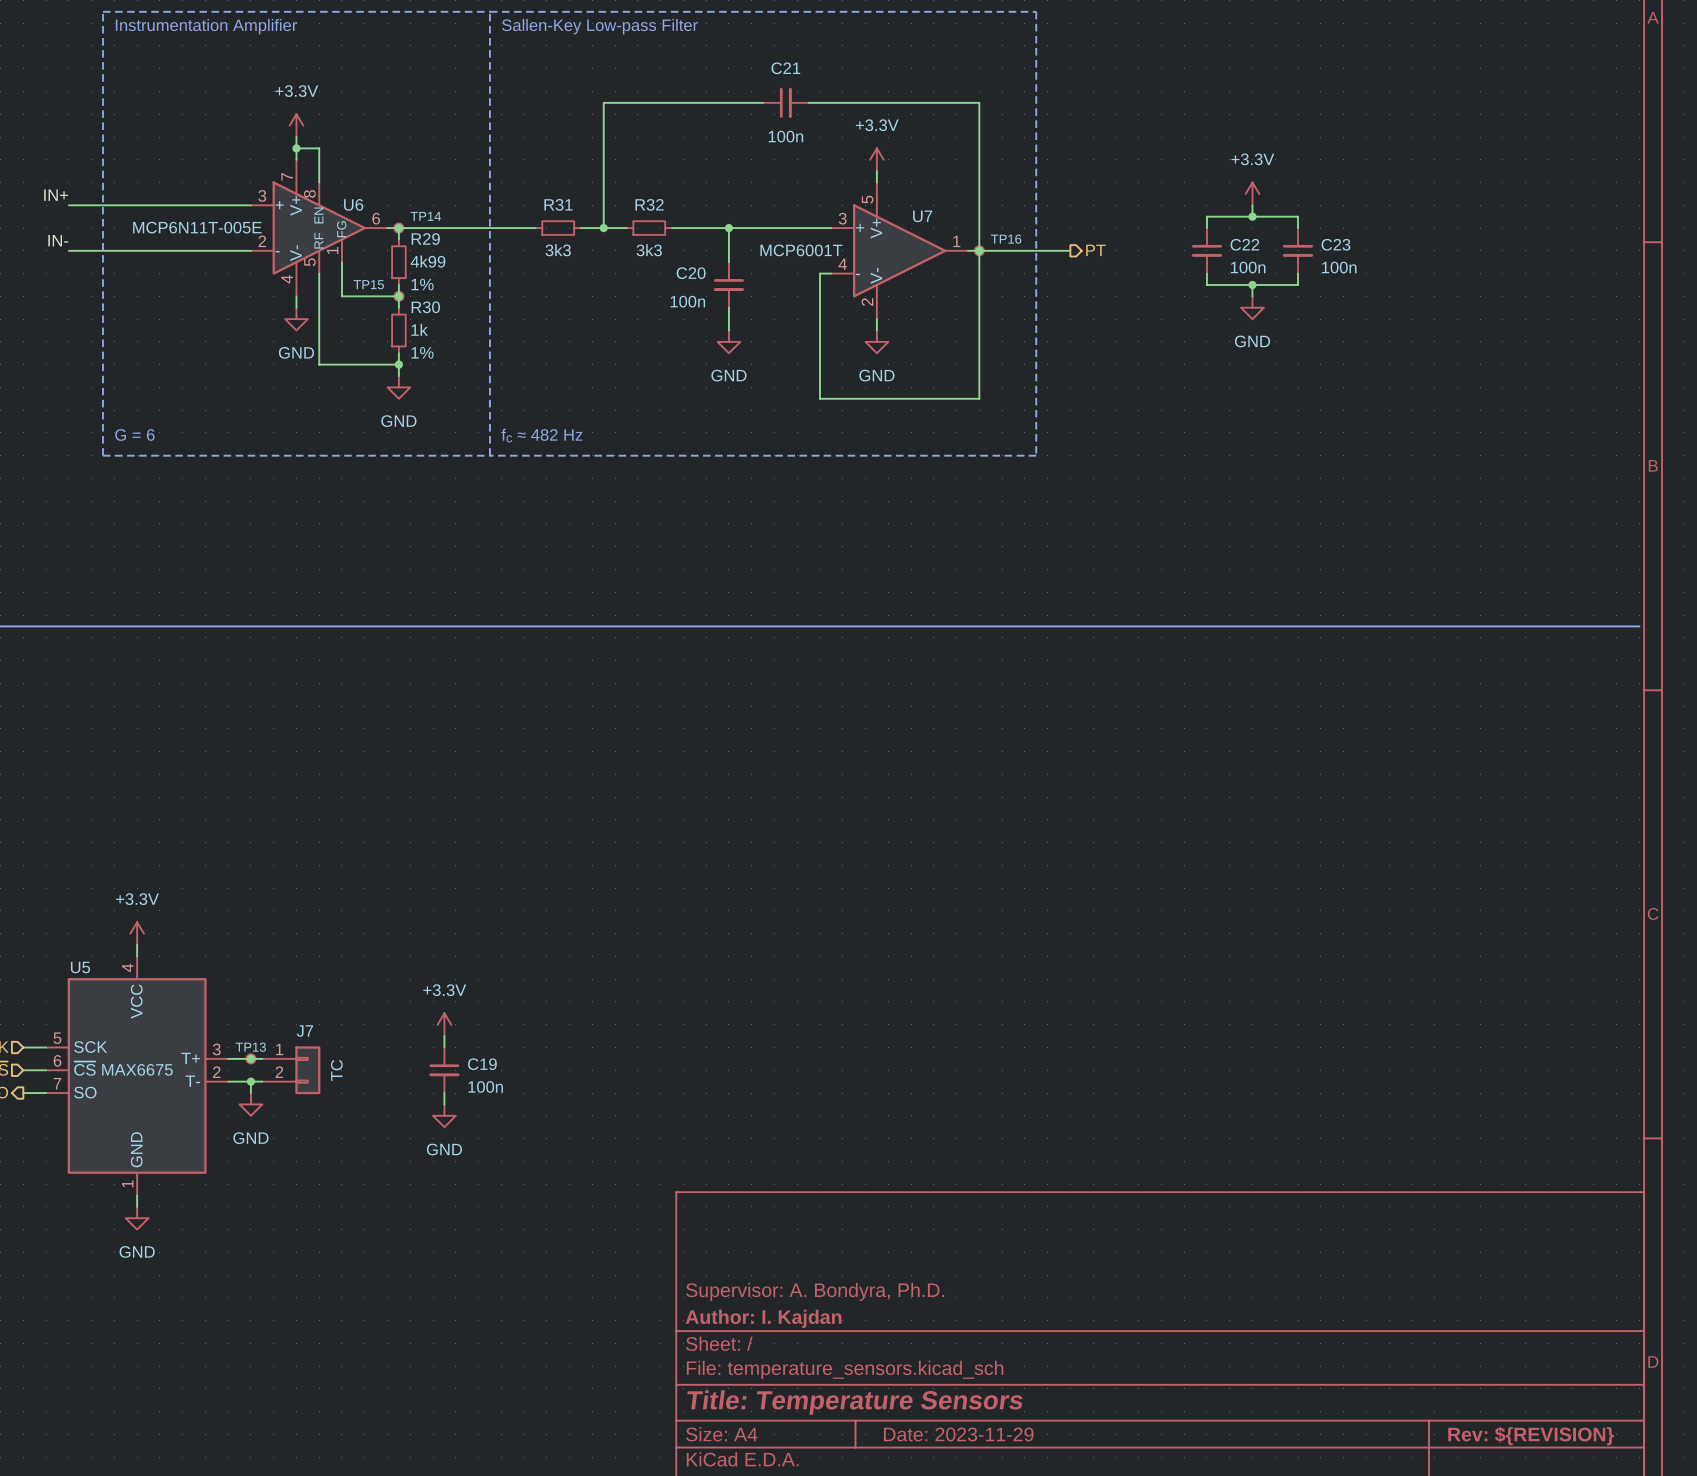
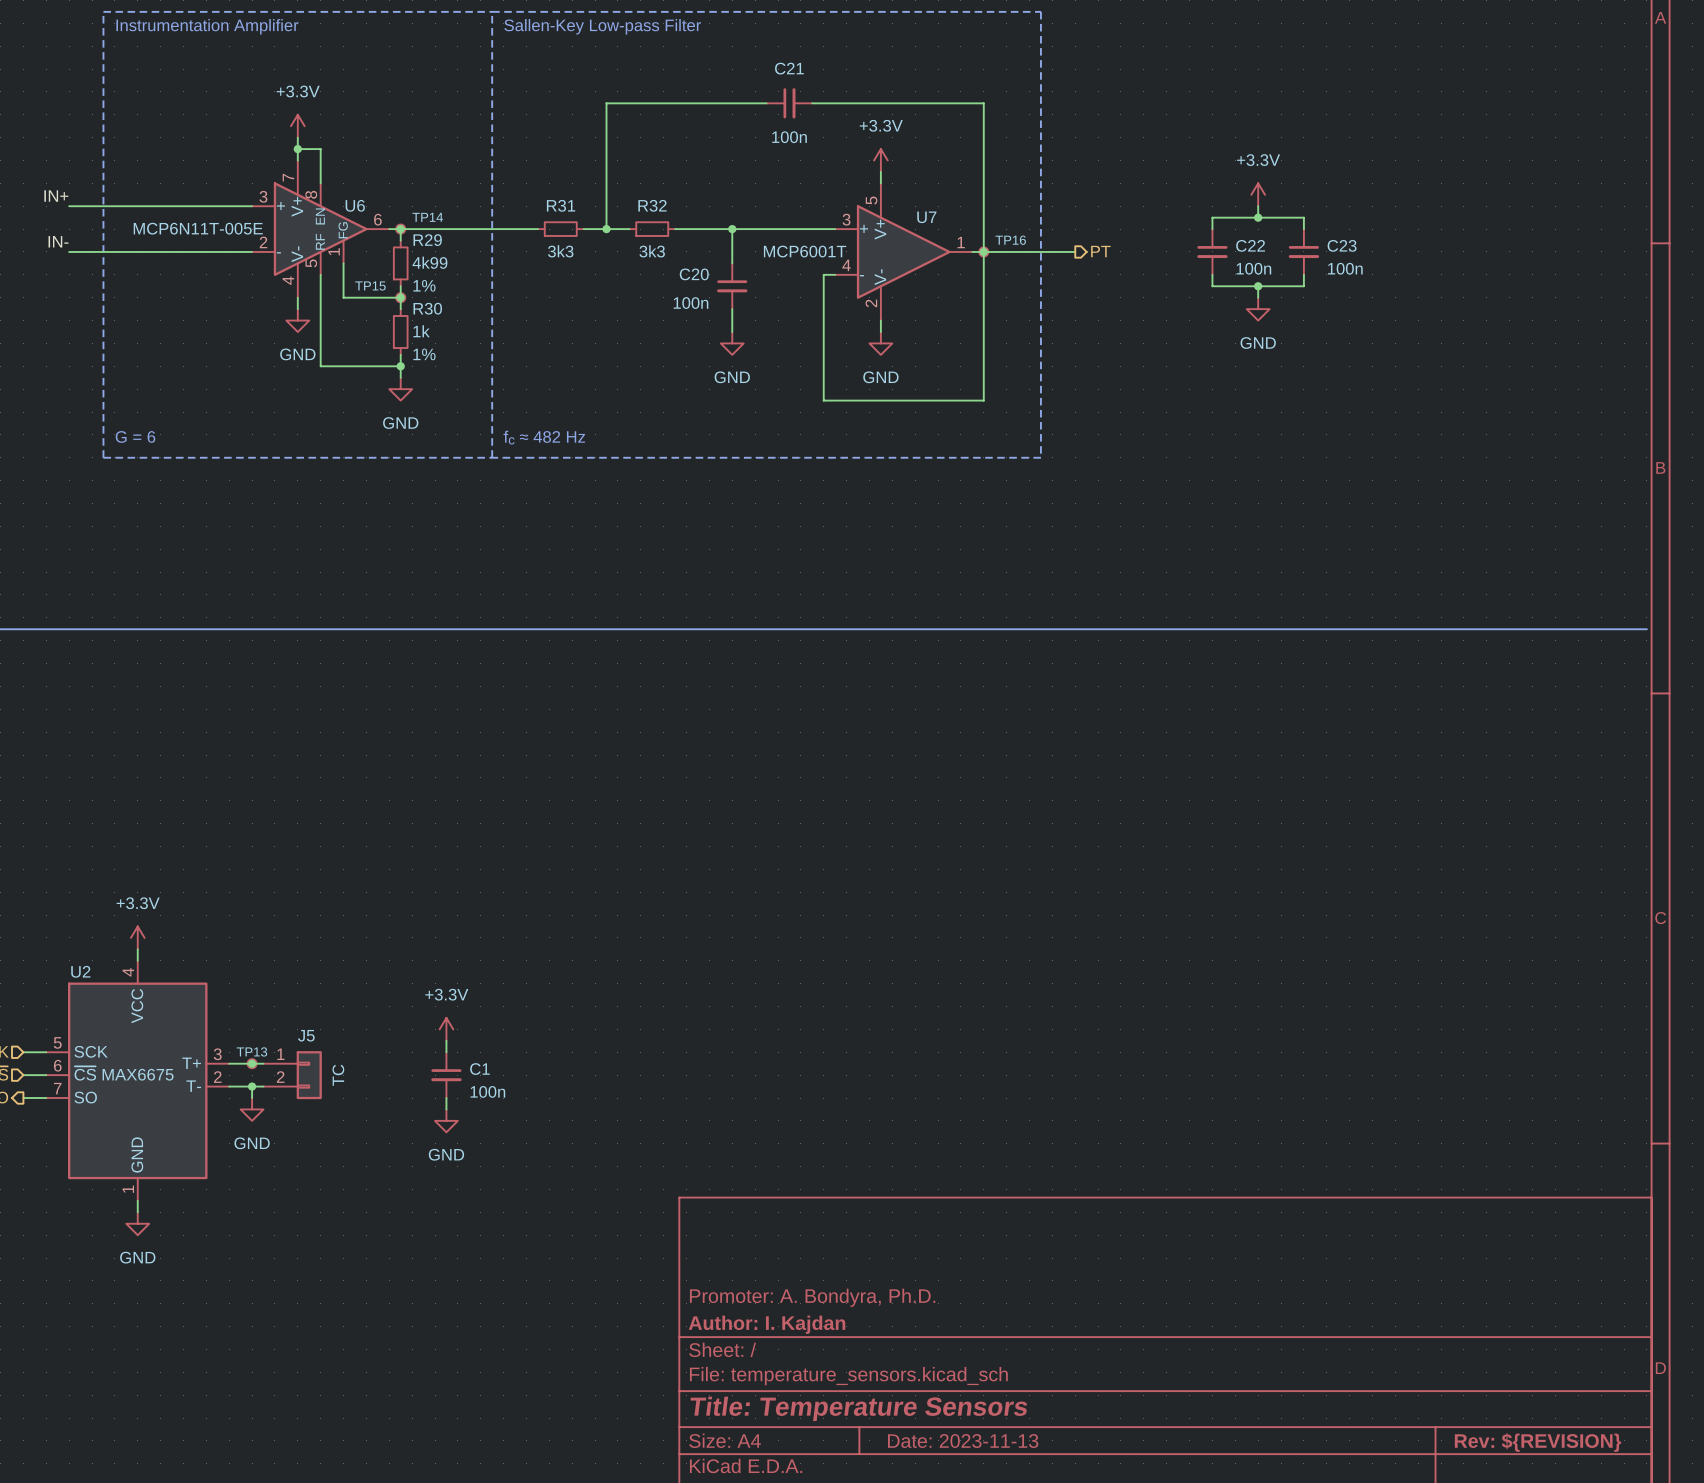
U5 name: U5 (80, 967) -> U2 (80, 971)
J7 name: J7 (304, 1031) -> J5 (306, 1035)
C19 name: C19 (482, 1064) -> C1 (479, 1069)
title block: Supervisor: A. Bondyra, Ph.D. (815, 1291) -> Promoter: A. Bondyra, Ph.D. (812, 1297)
title block: Date: 2023-11-29 (958, 1434) -> Date: 2023-11-13 (963, 1441)

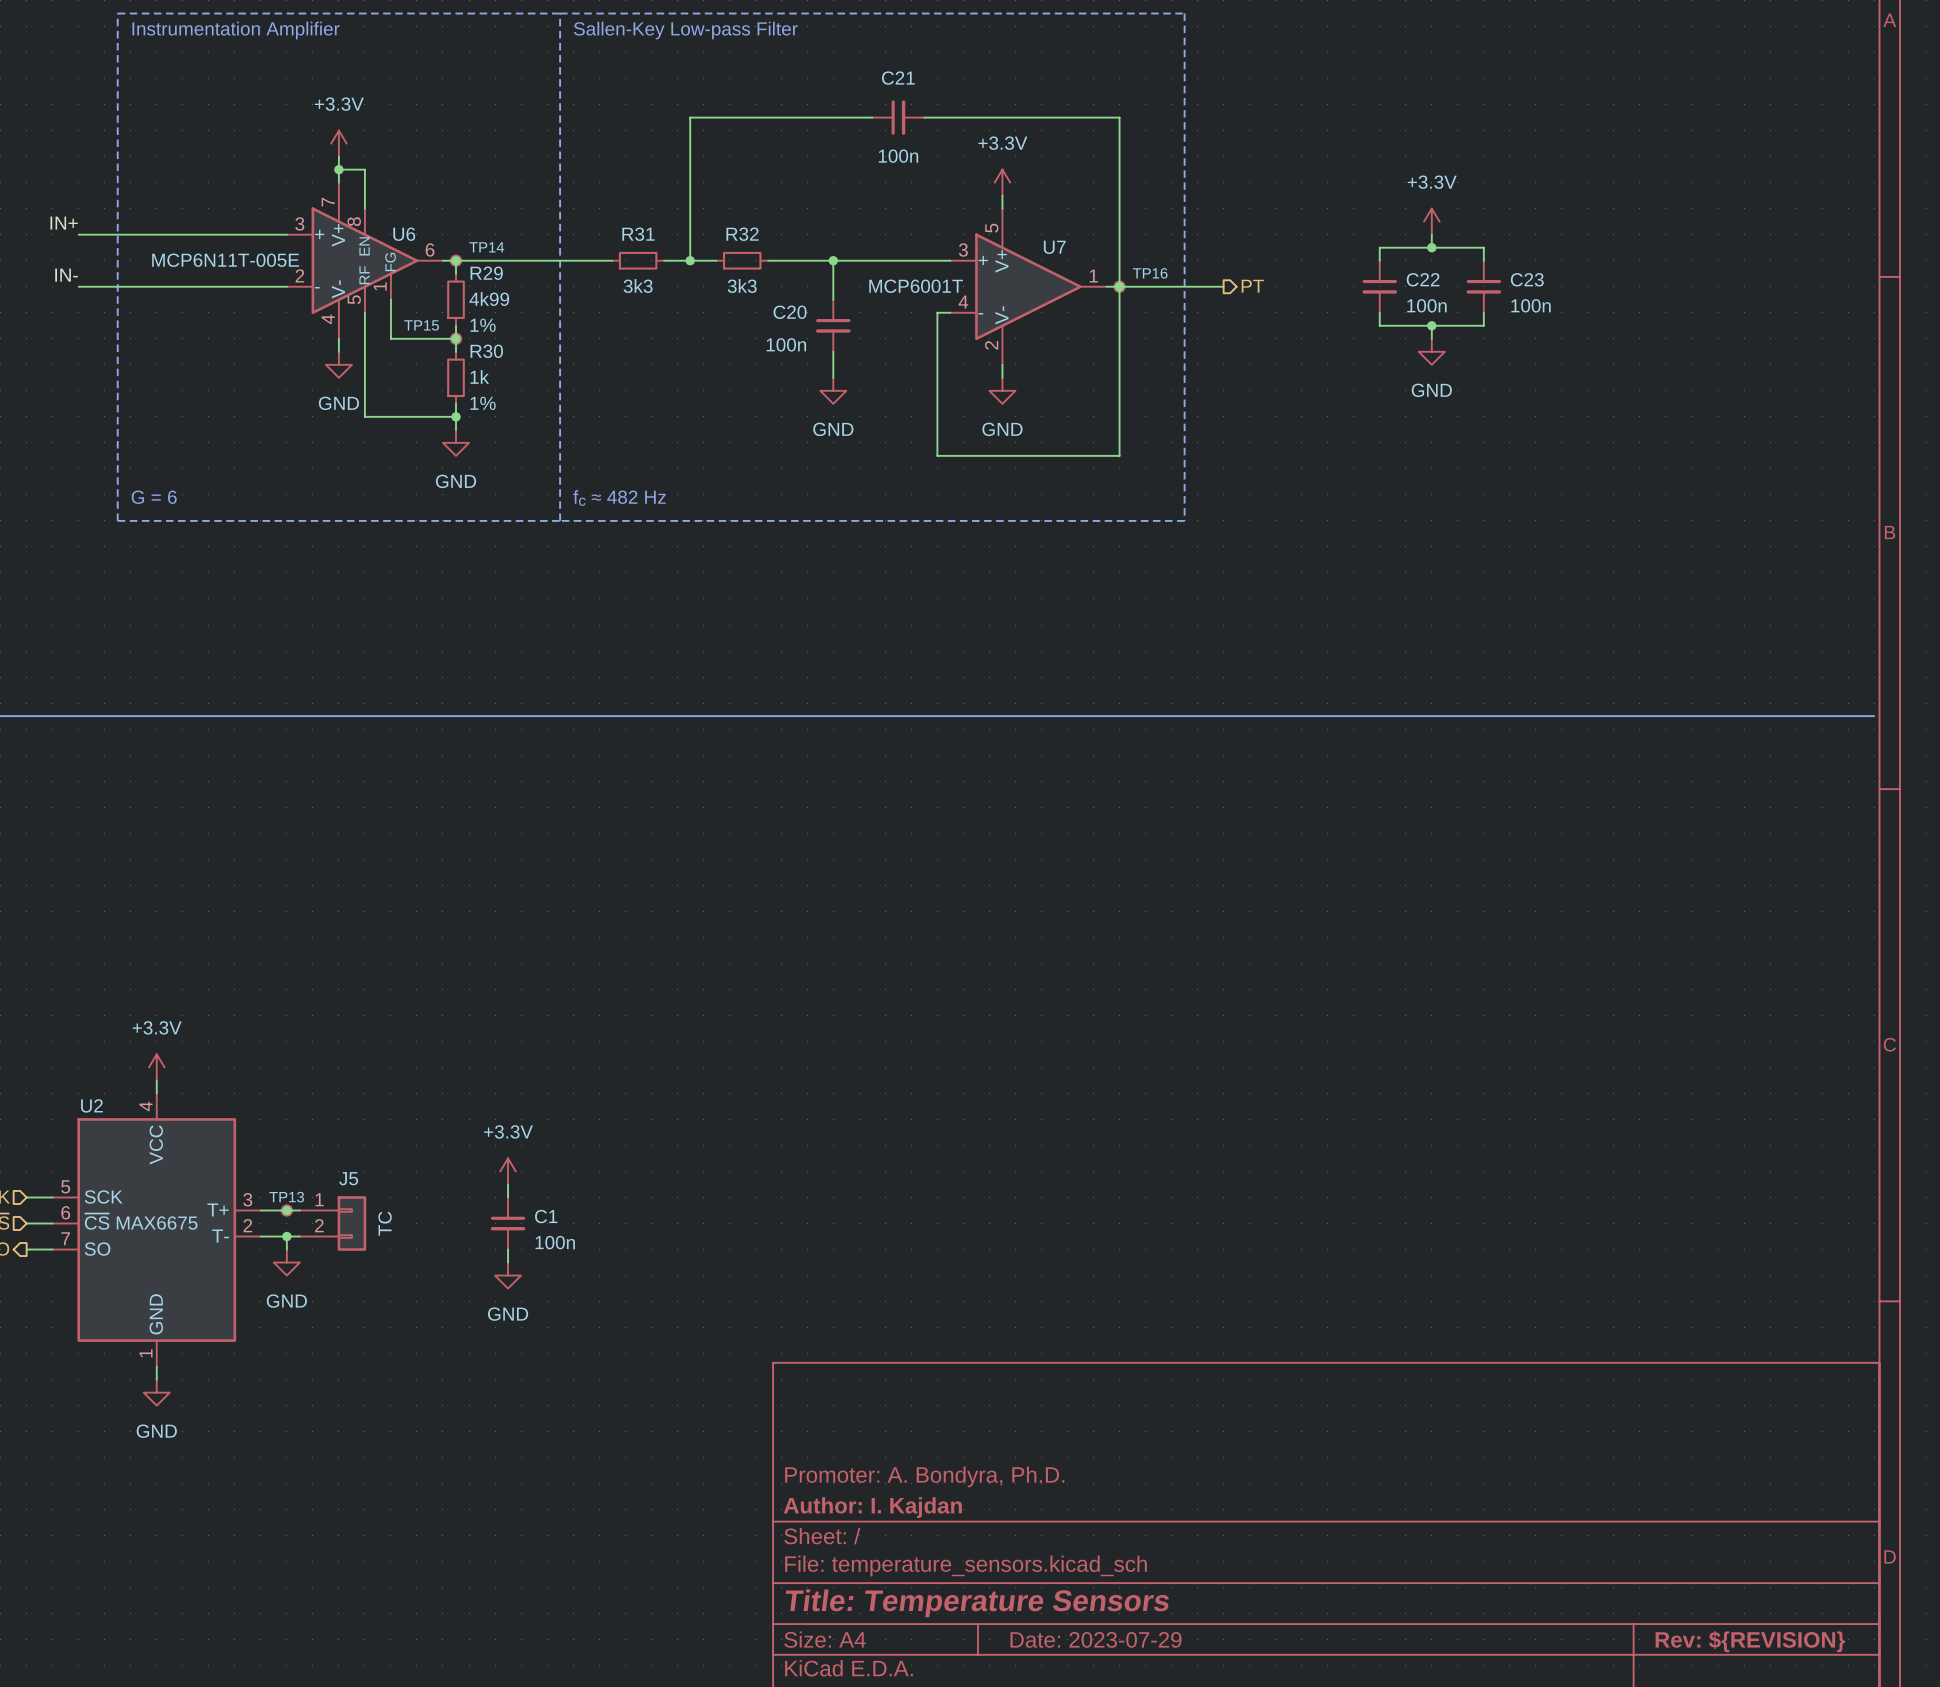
title block: Date: 2023-11-13 (963, 1441) -> Date: 2023-07-29 (1096, 1639)

